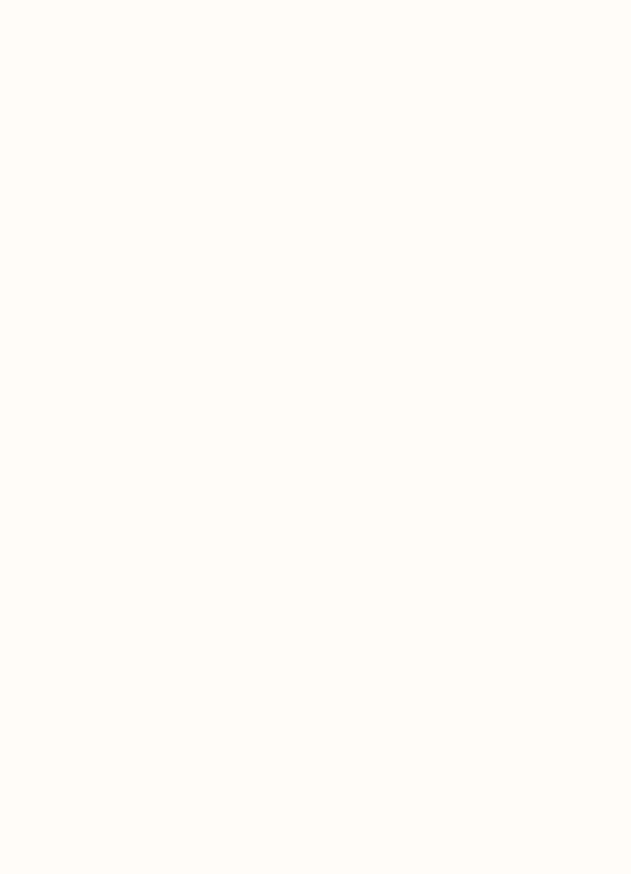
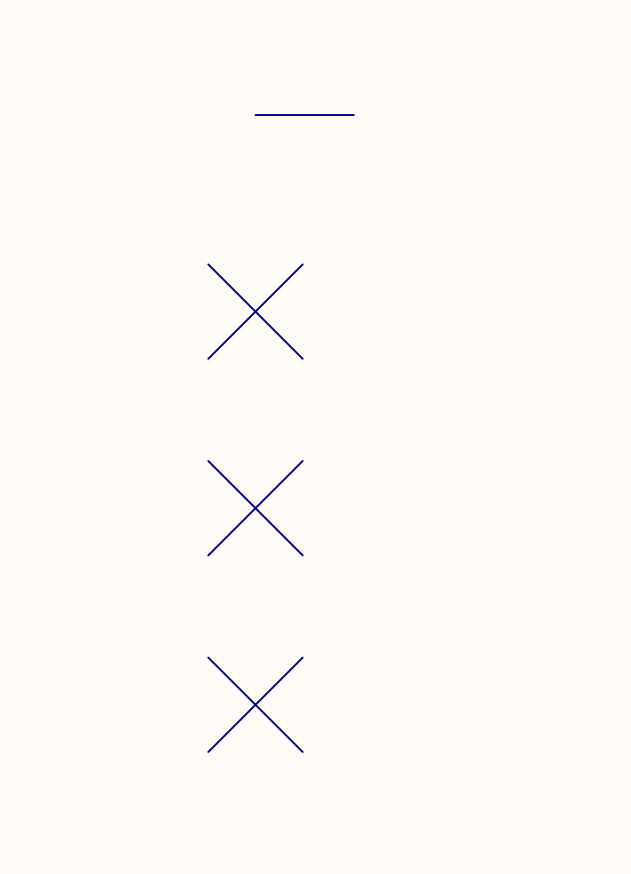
wire: none -> (255, 115) (353, 115)
no-connect mark: none -> (255, 311)
no-connect mark: none -> (255, 508)
no-connect mark: none -> (255, 704)

